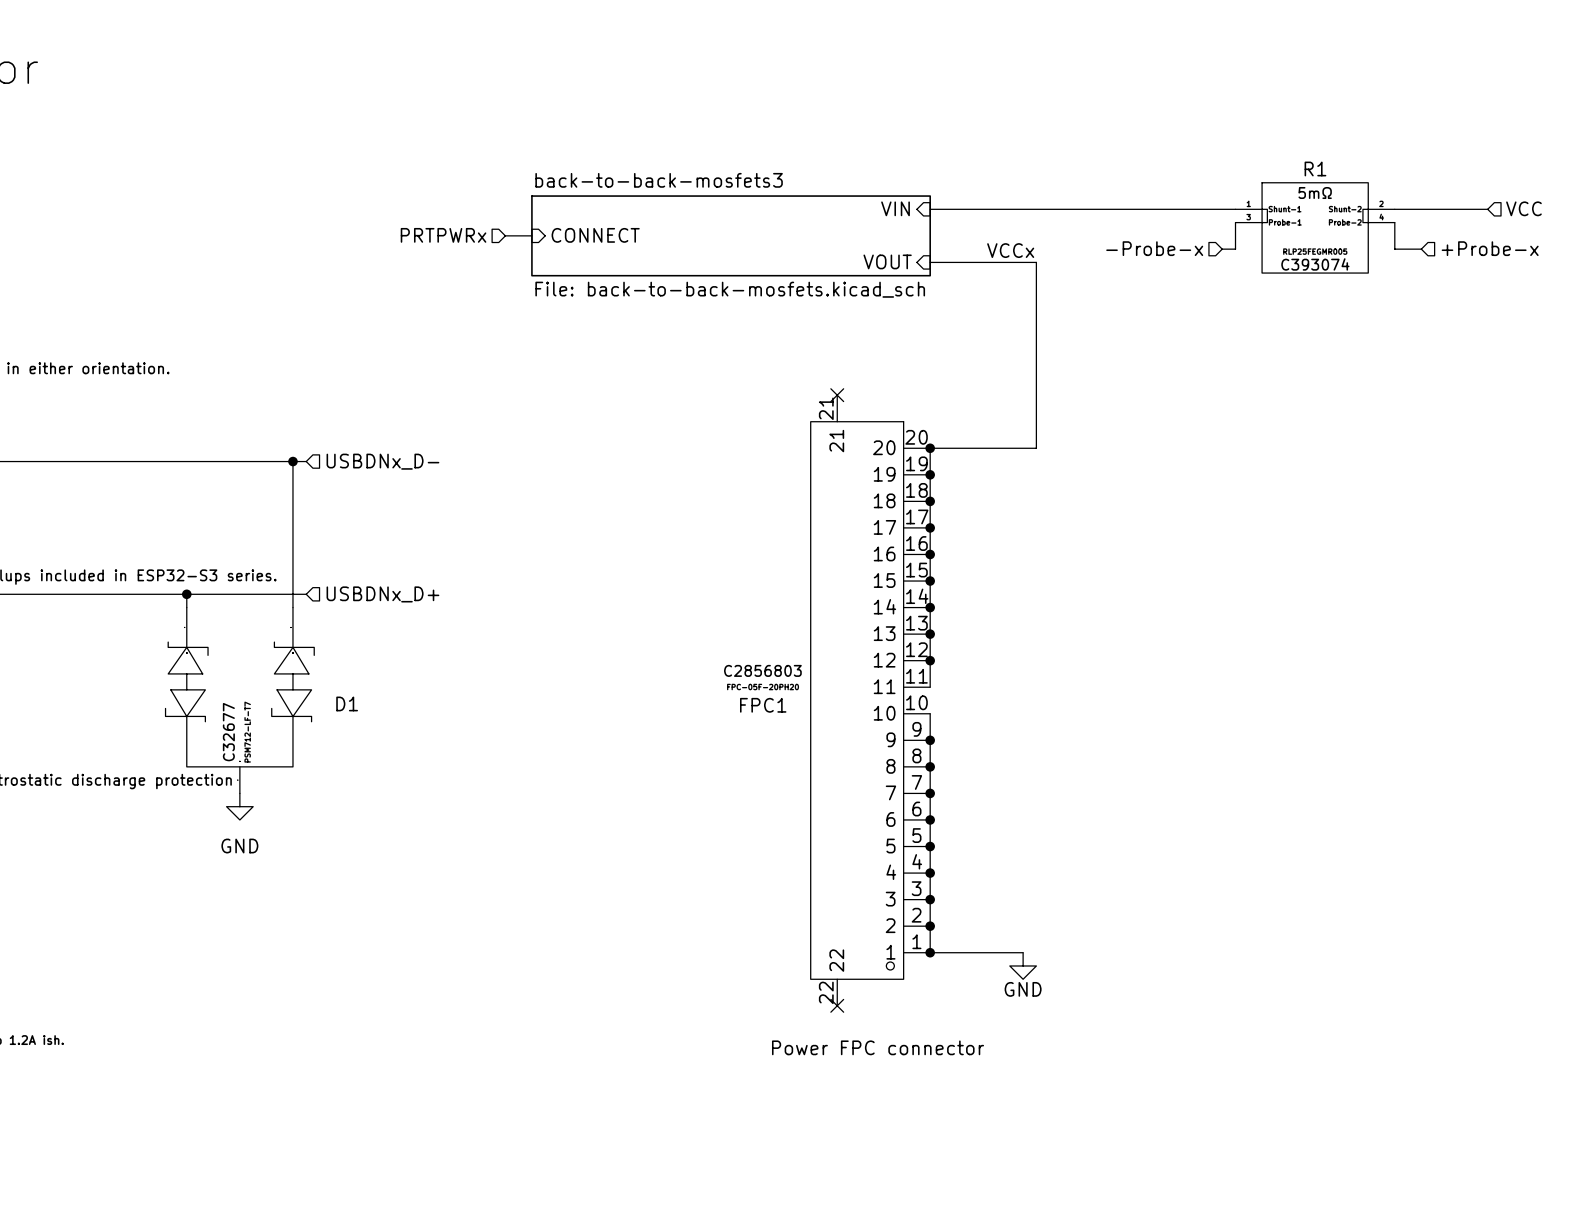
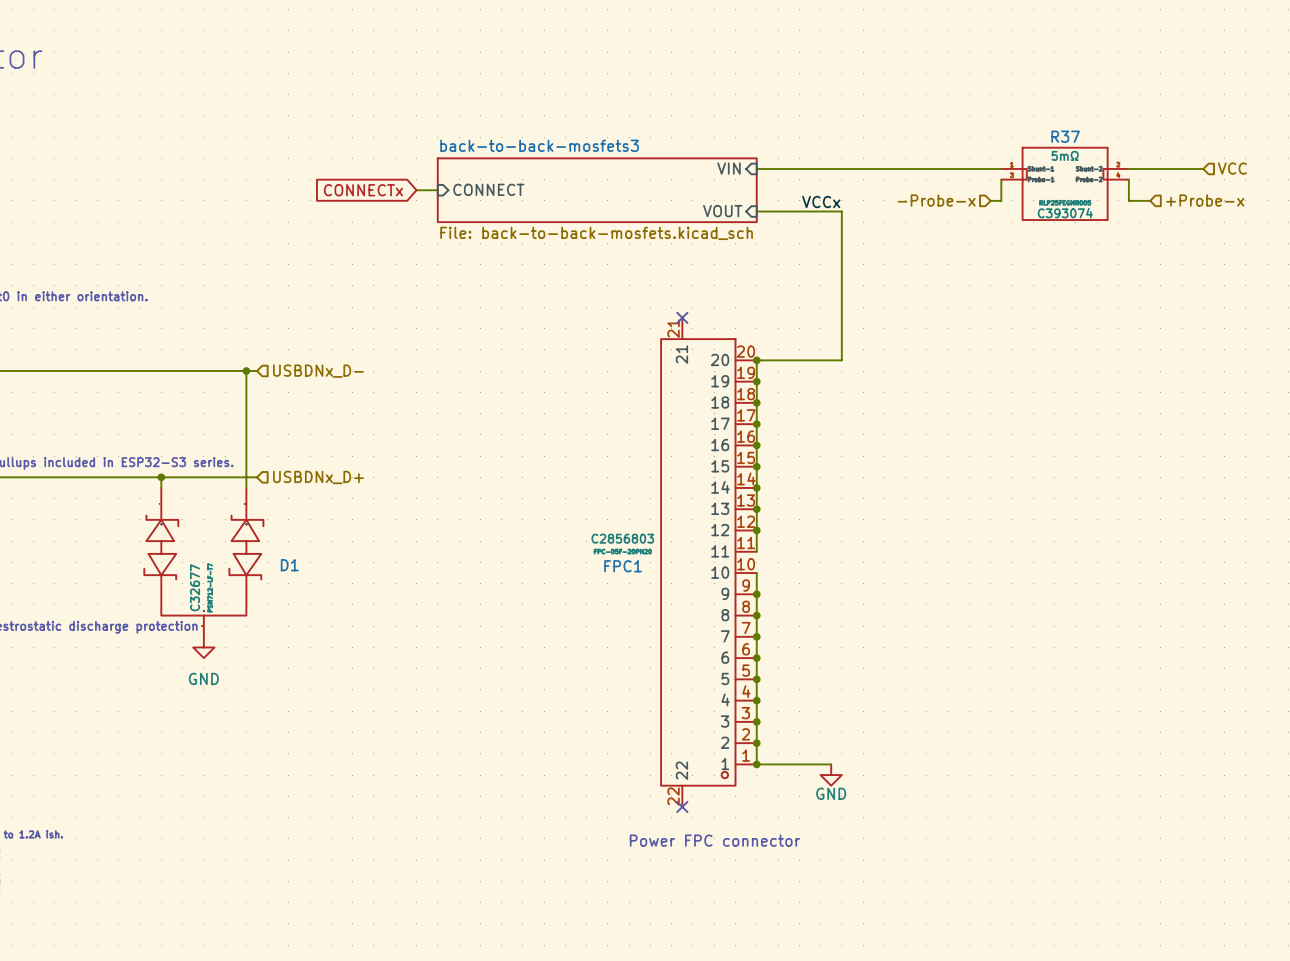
R1 name: R1 (1315, 169) -> R37 (1065, 136)
global label: none -> CONNECTx (363, 190)
hierarchical label: PRTPWRx (443, 235) -> none

